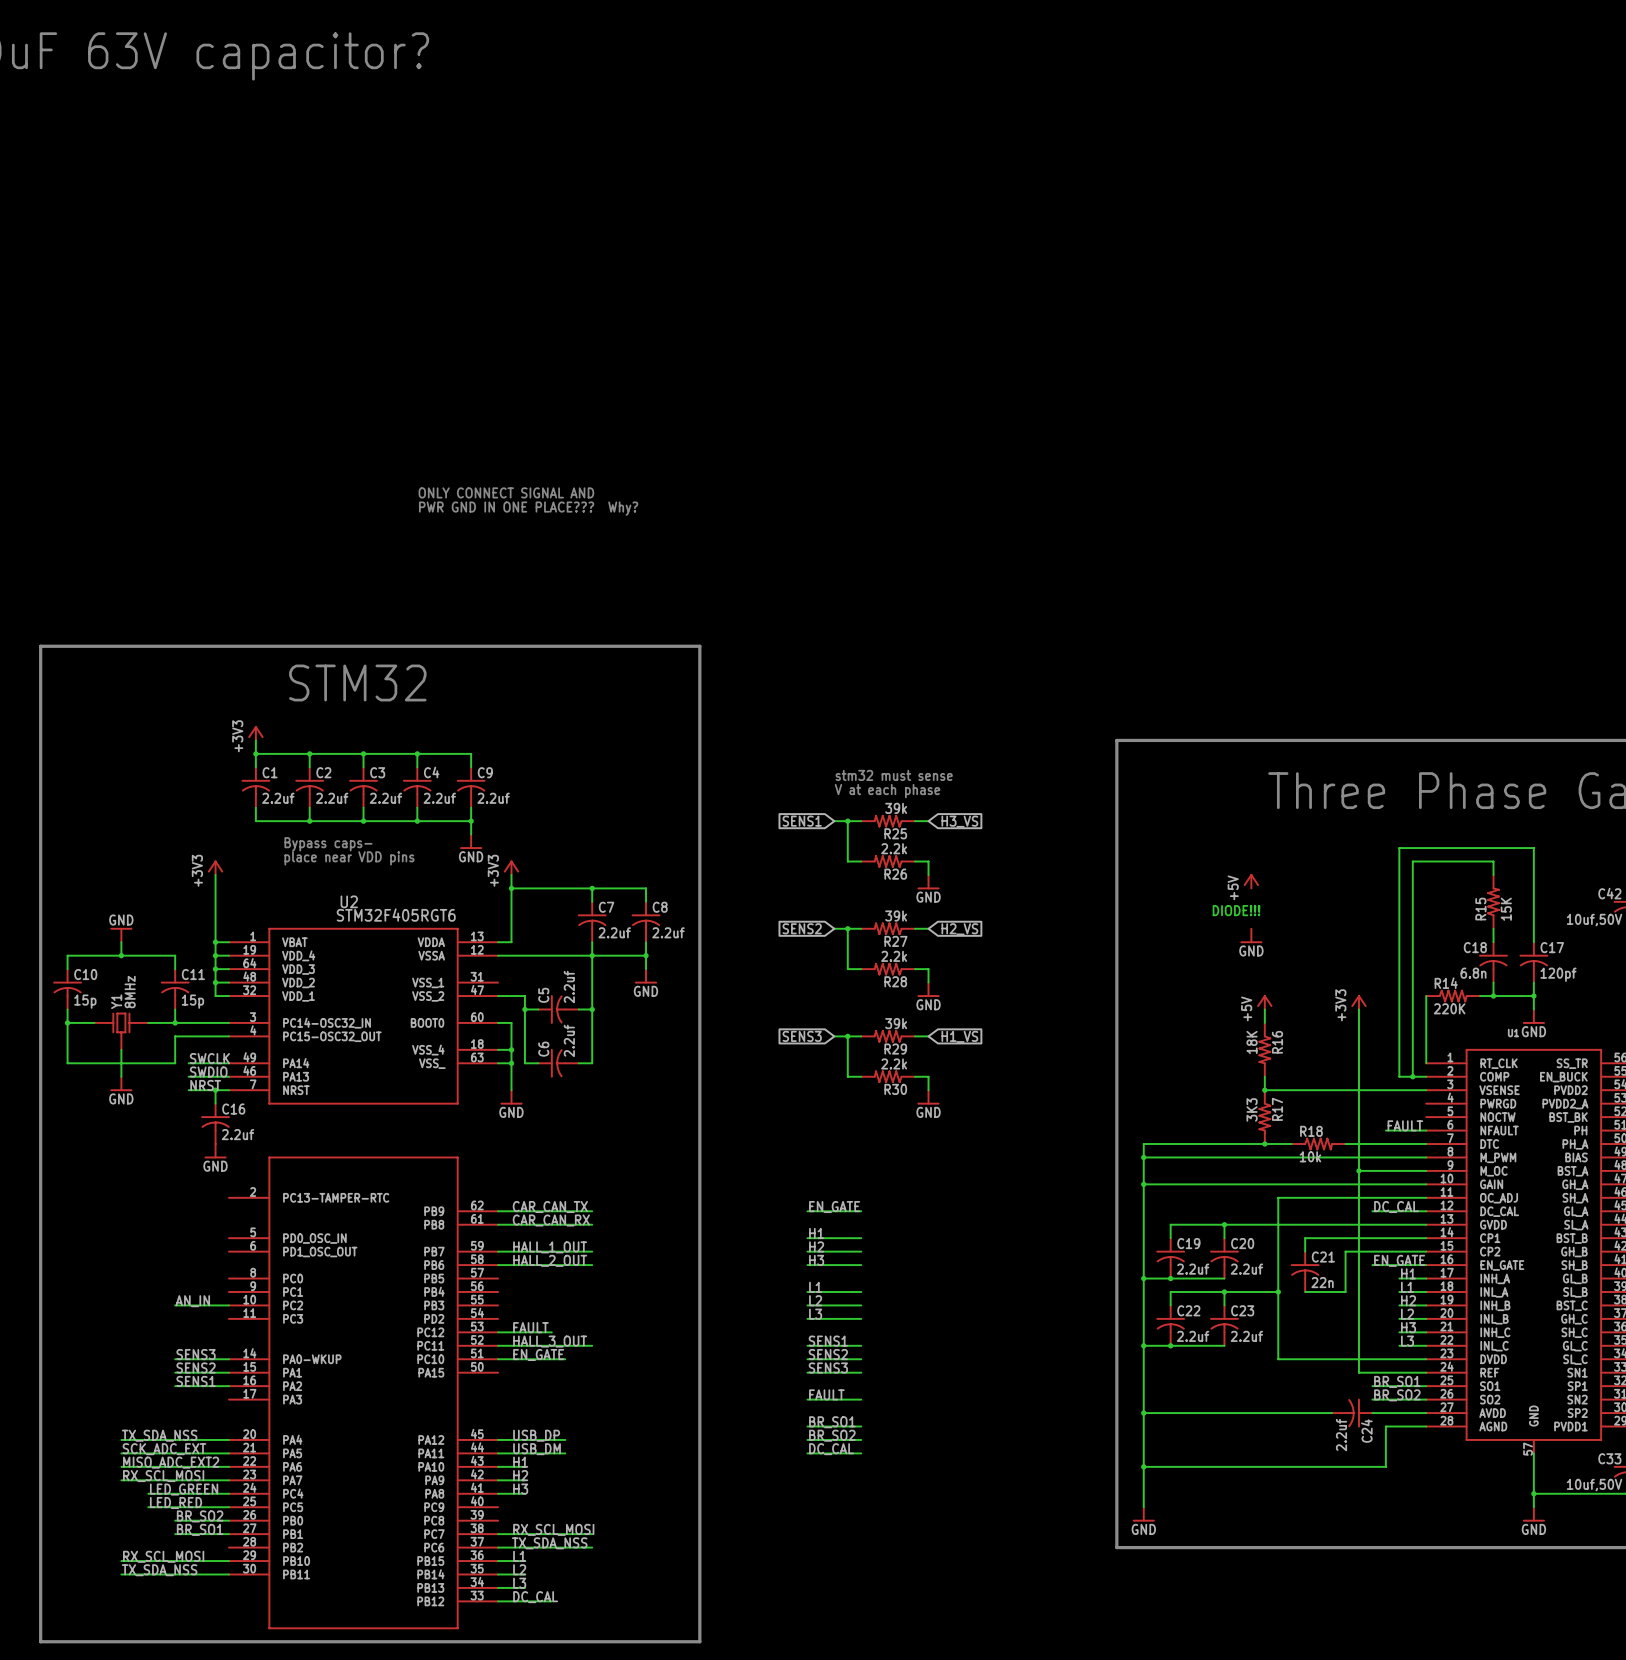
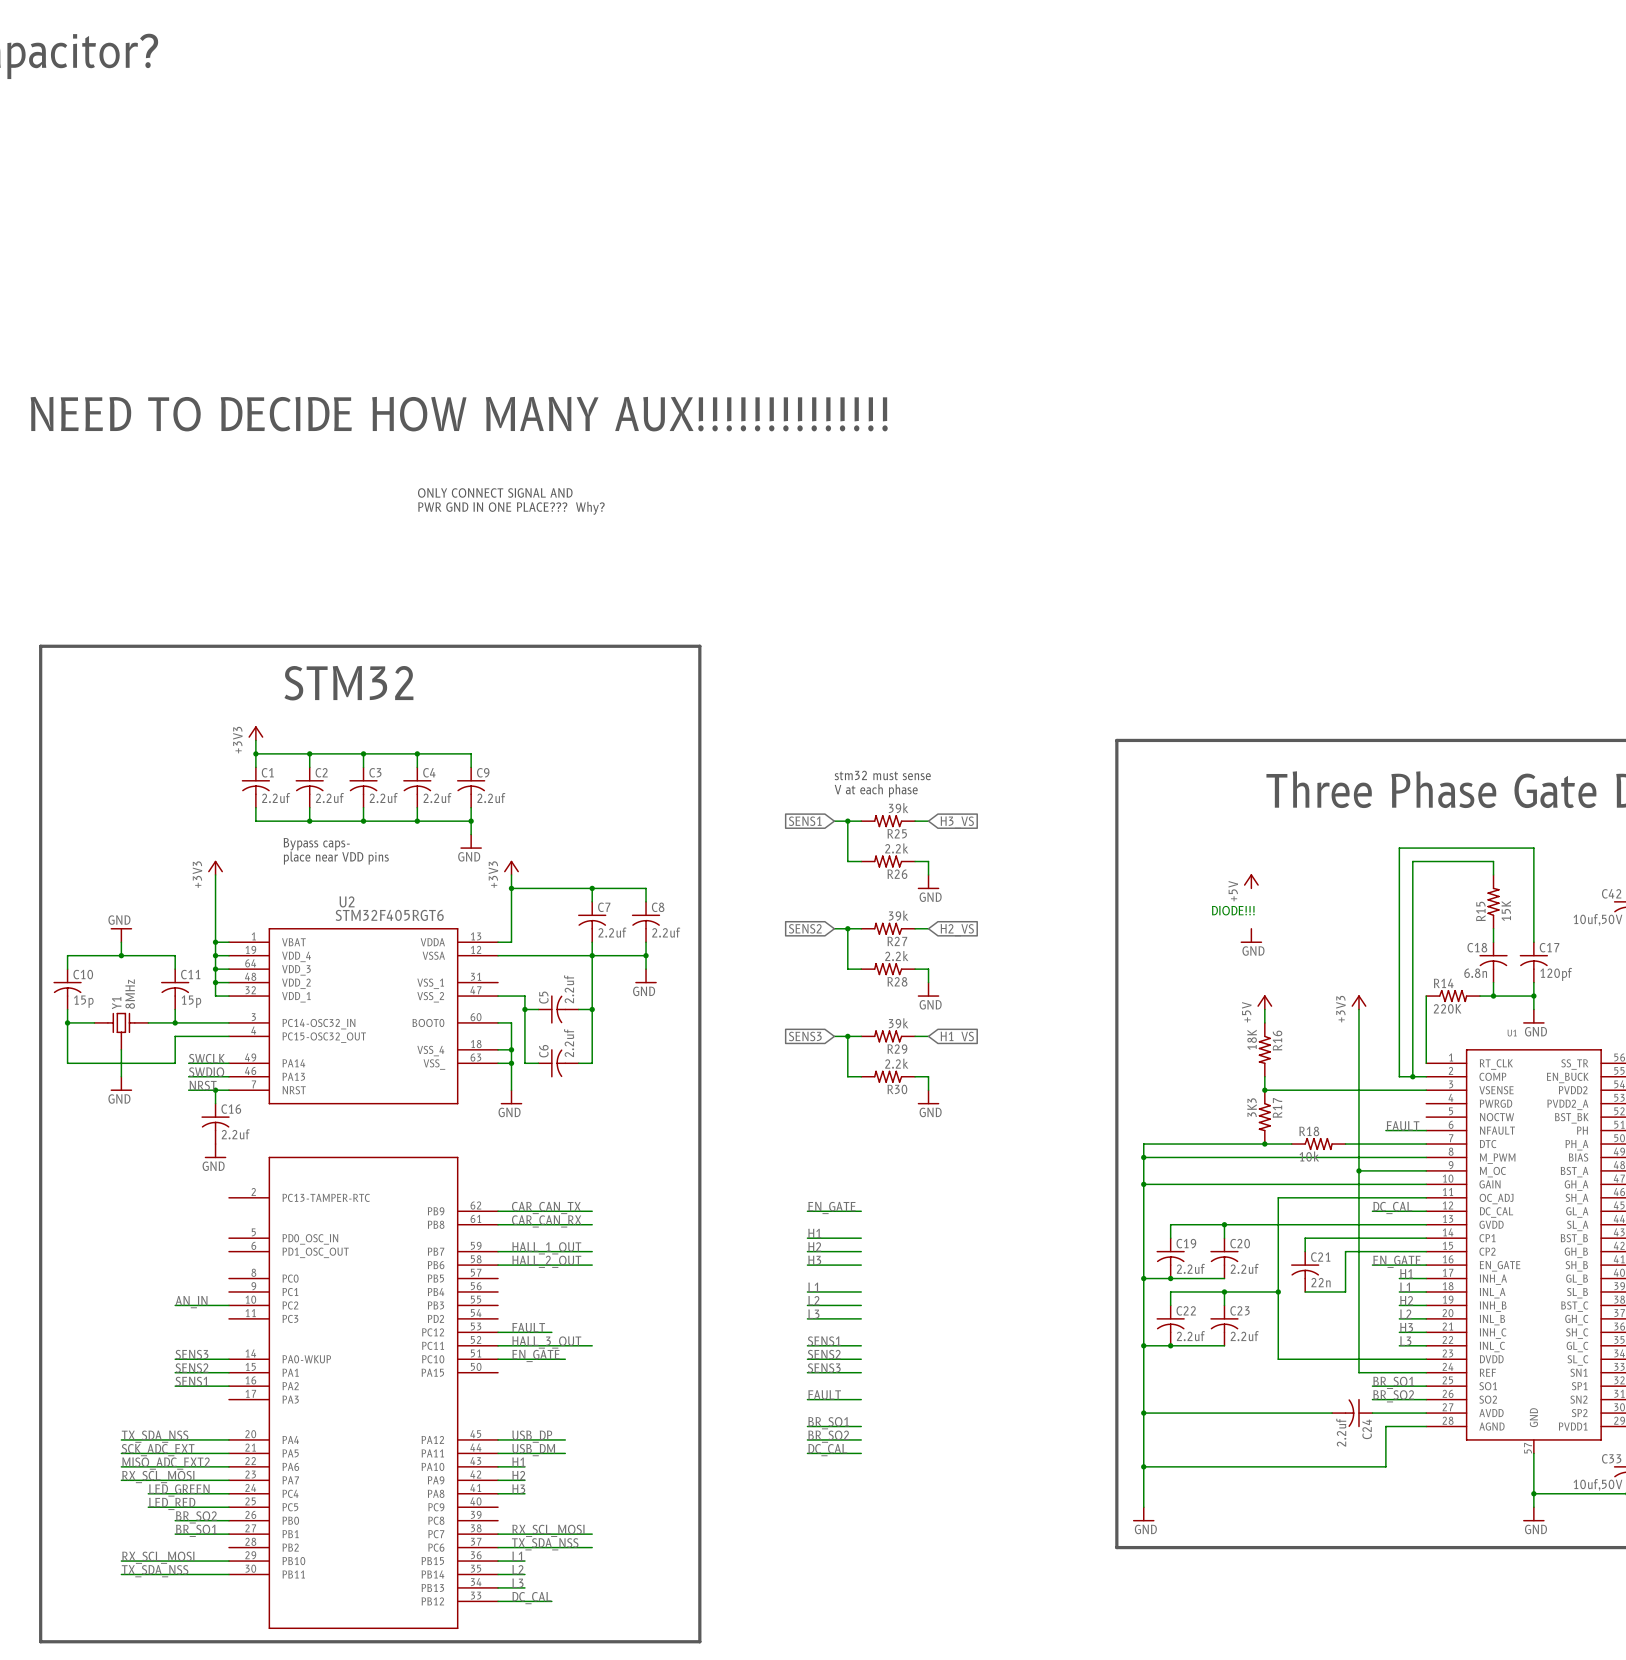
text: none -> NEED TO DECIDE HOW MANY AUX!!!!!!!!!!!!!! (459, 414)

